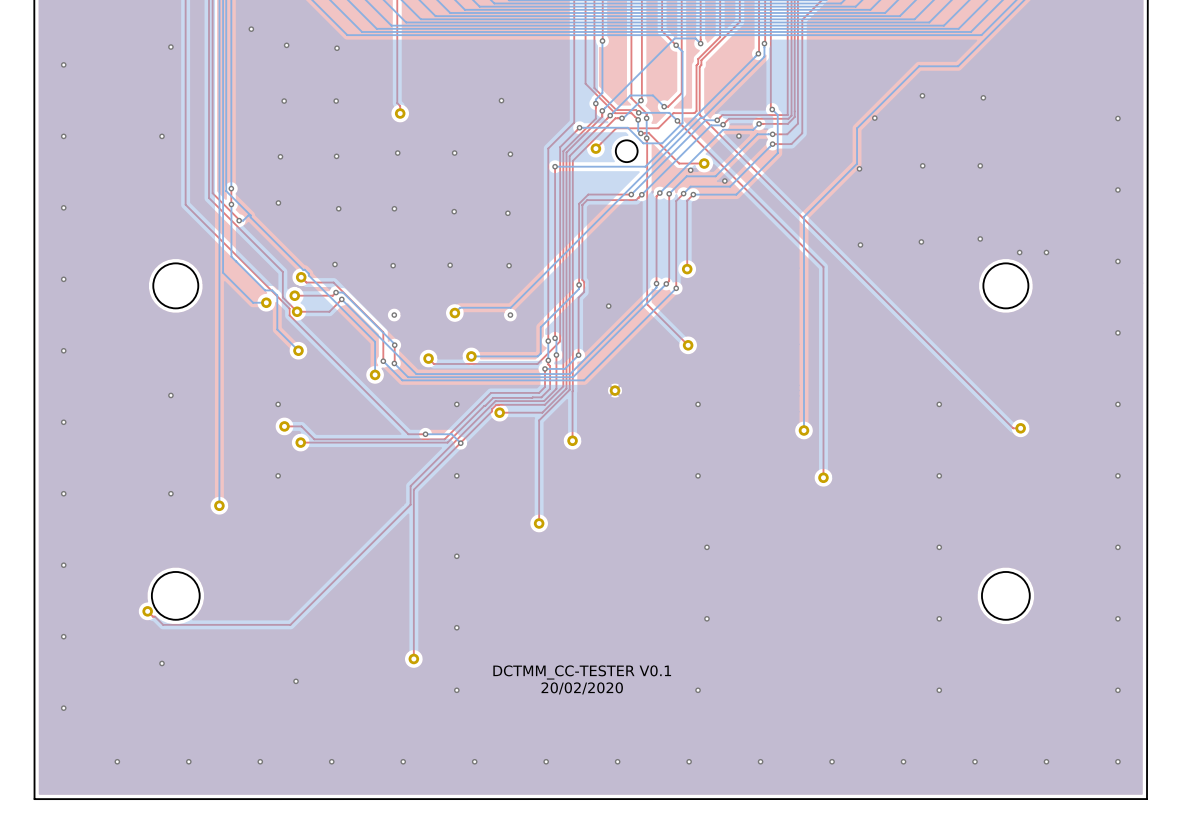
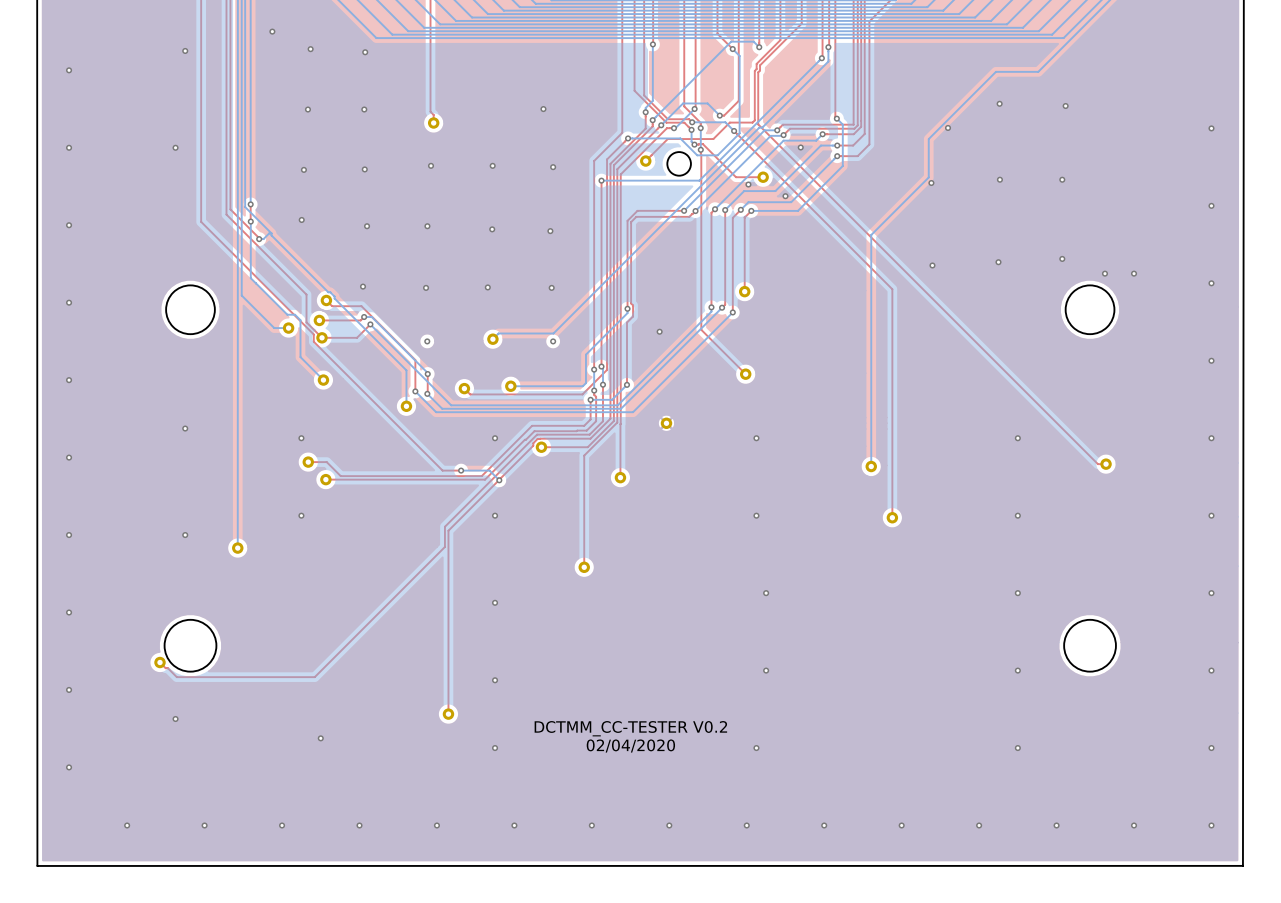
text: DCTMM_CC-TESTER V0.1 (582, 672) -> DCTMM_CC-TESTER V0.2 (630, 728)
text: 20/02/2020 (582, 688) -> 02/04/2020 (630, 746)

